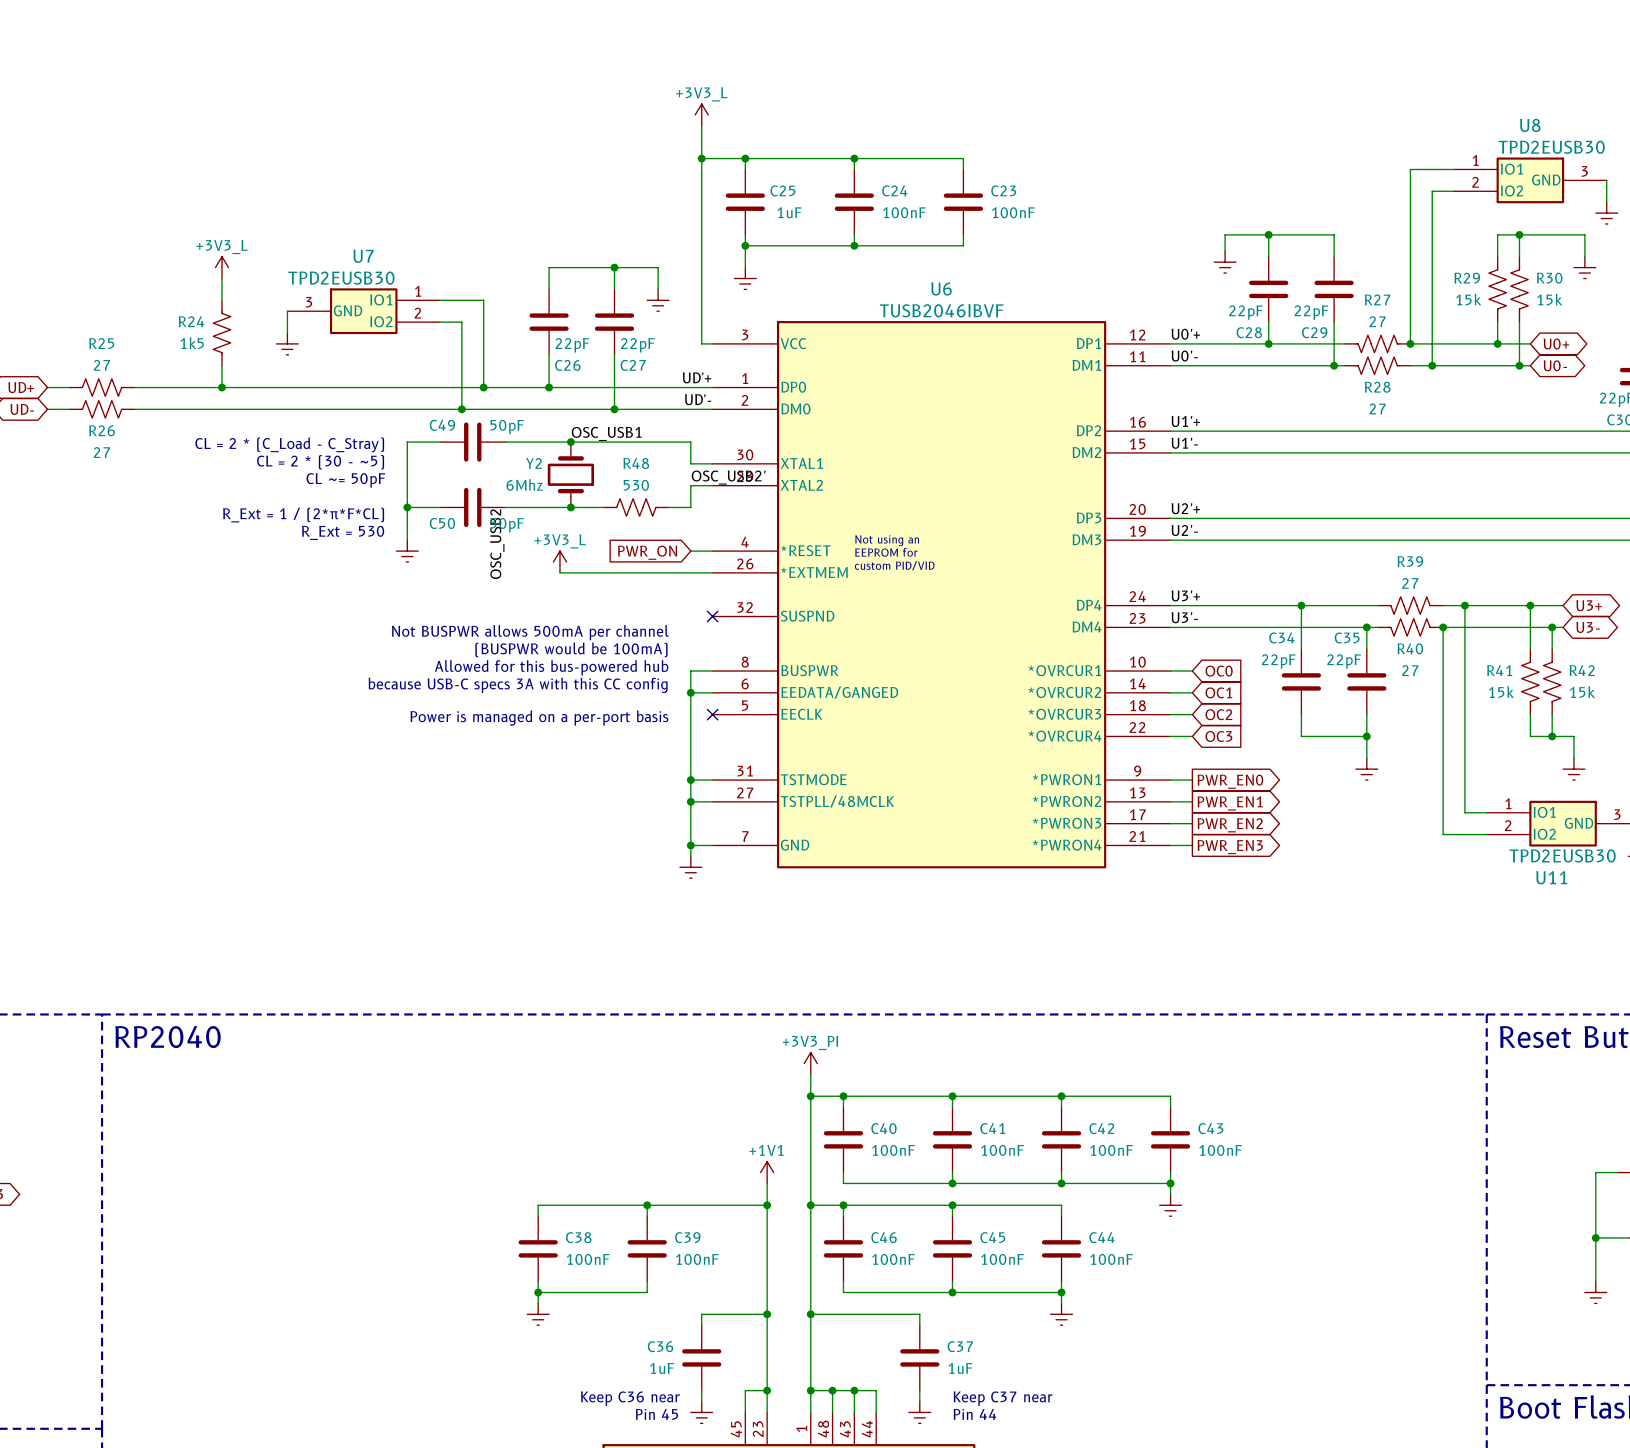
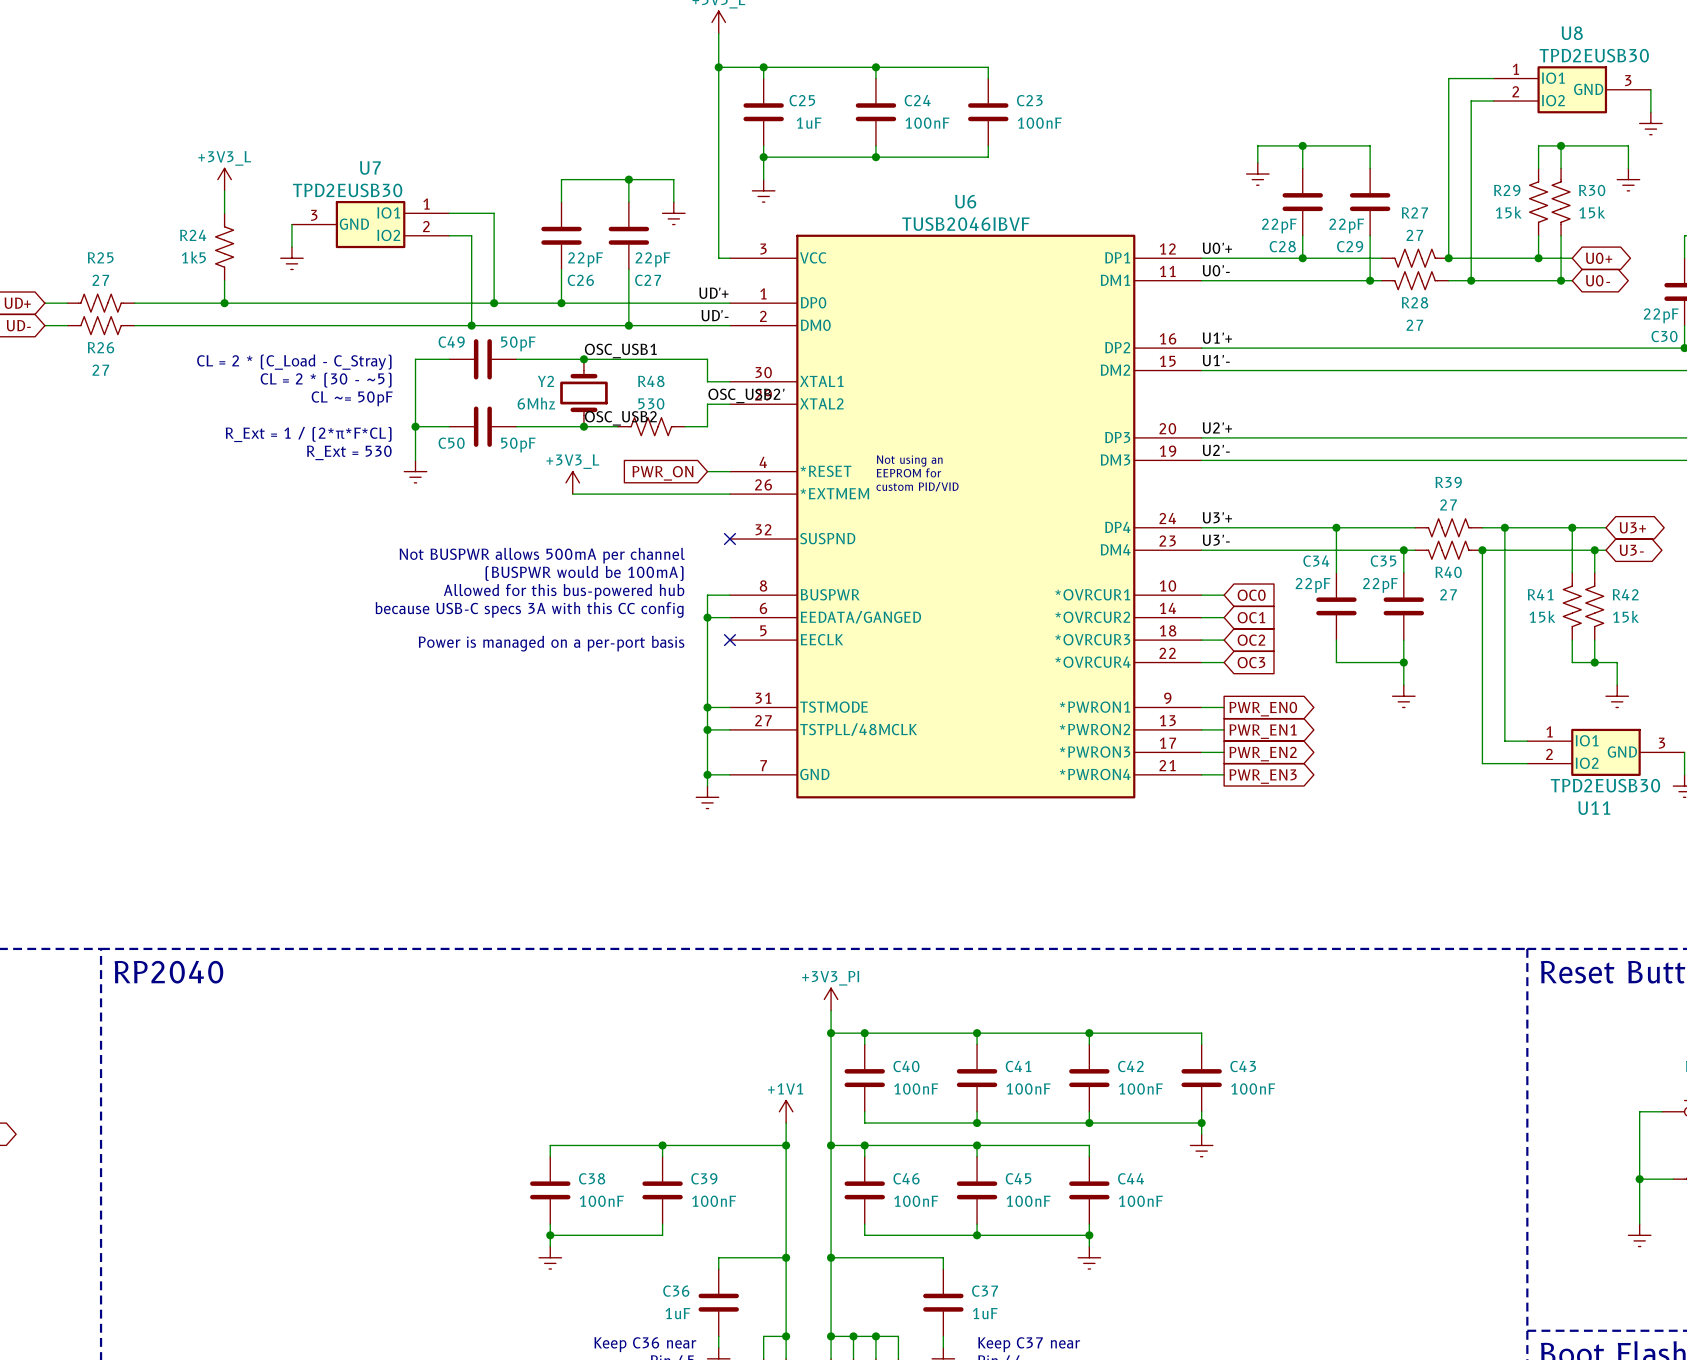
label rotation: 0° (497, 544) -> 90° clockwise (620, 418)
label position: OSC_USB2 (497, 544) -> OSC_USB2 (620, 418)

